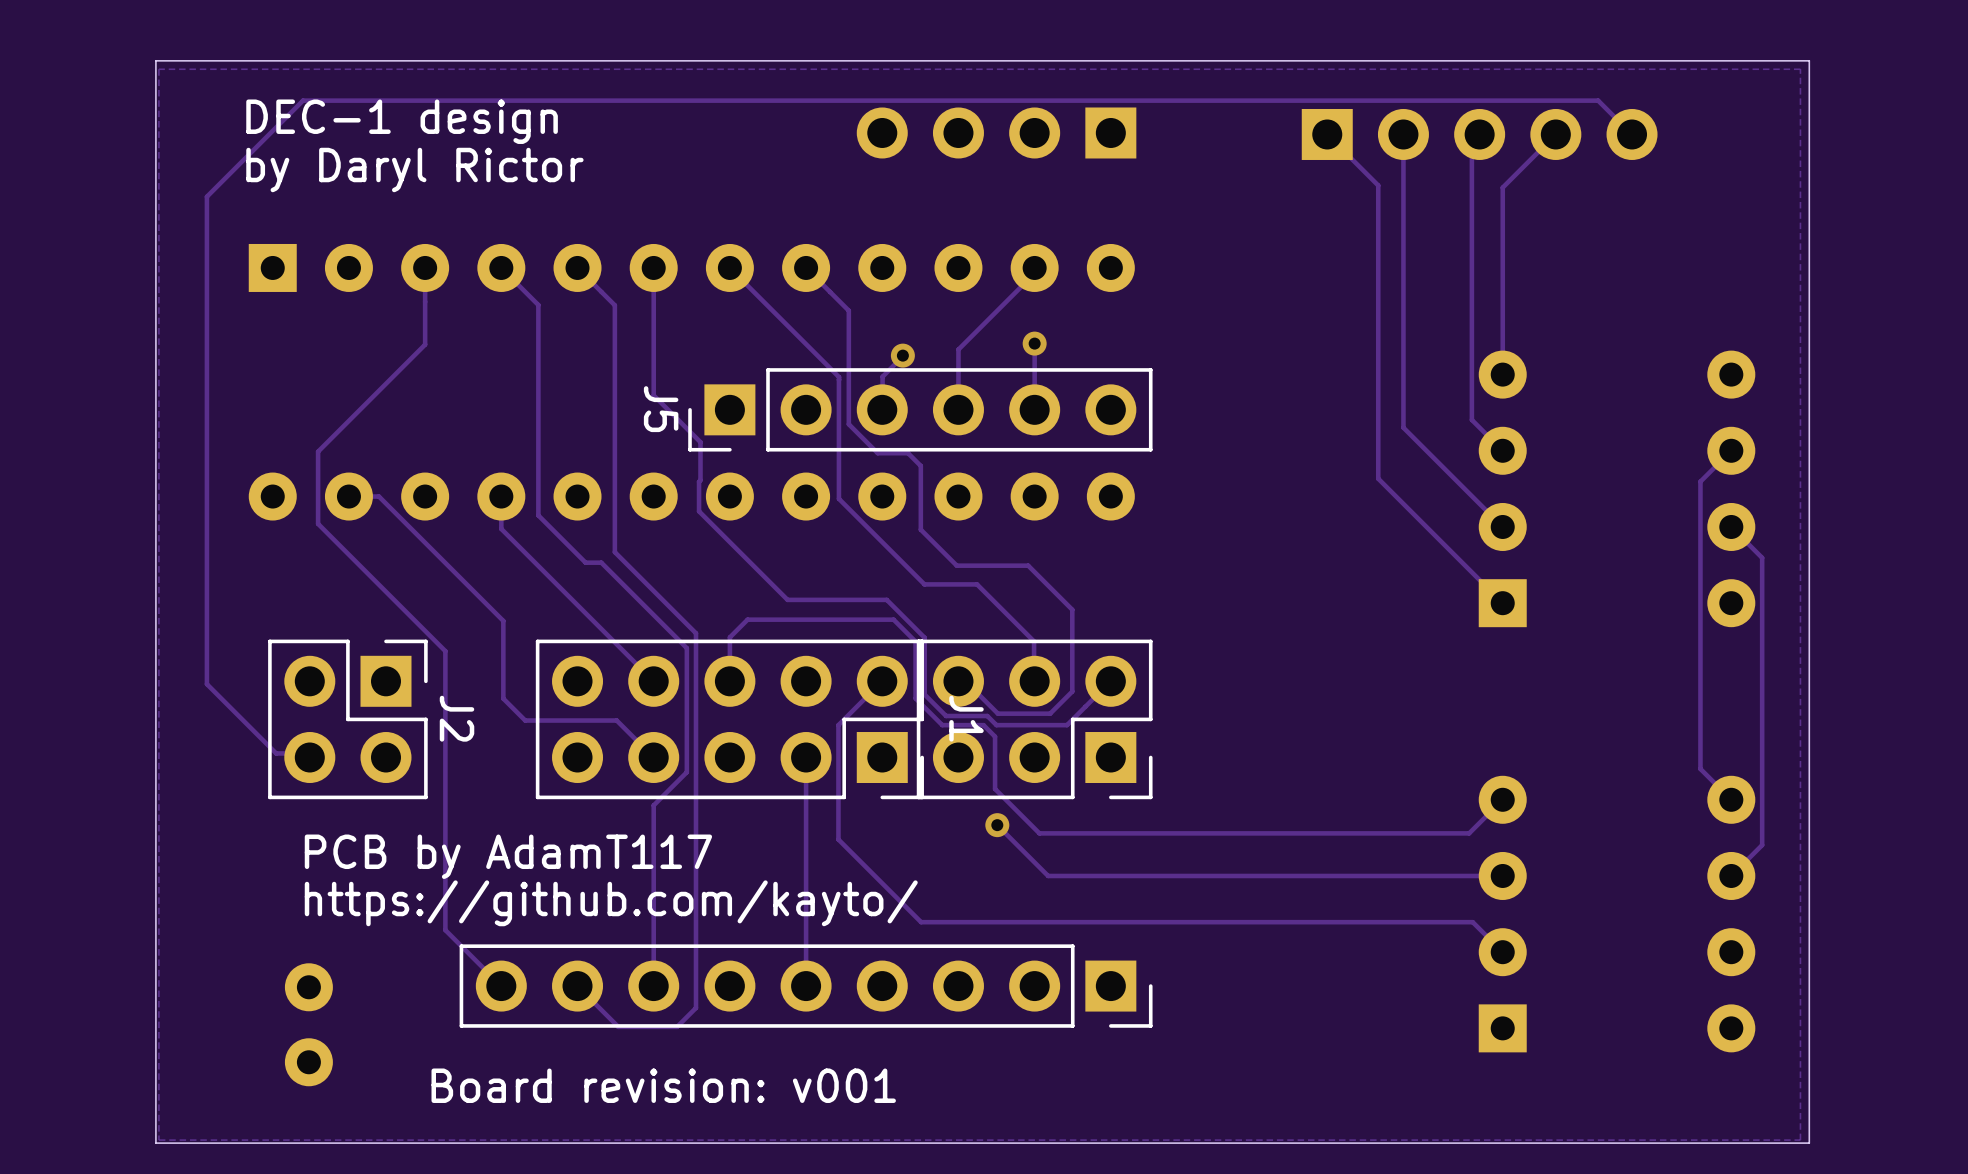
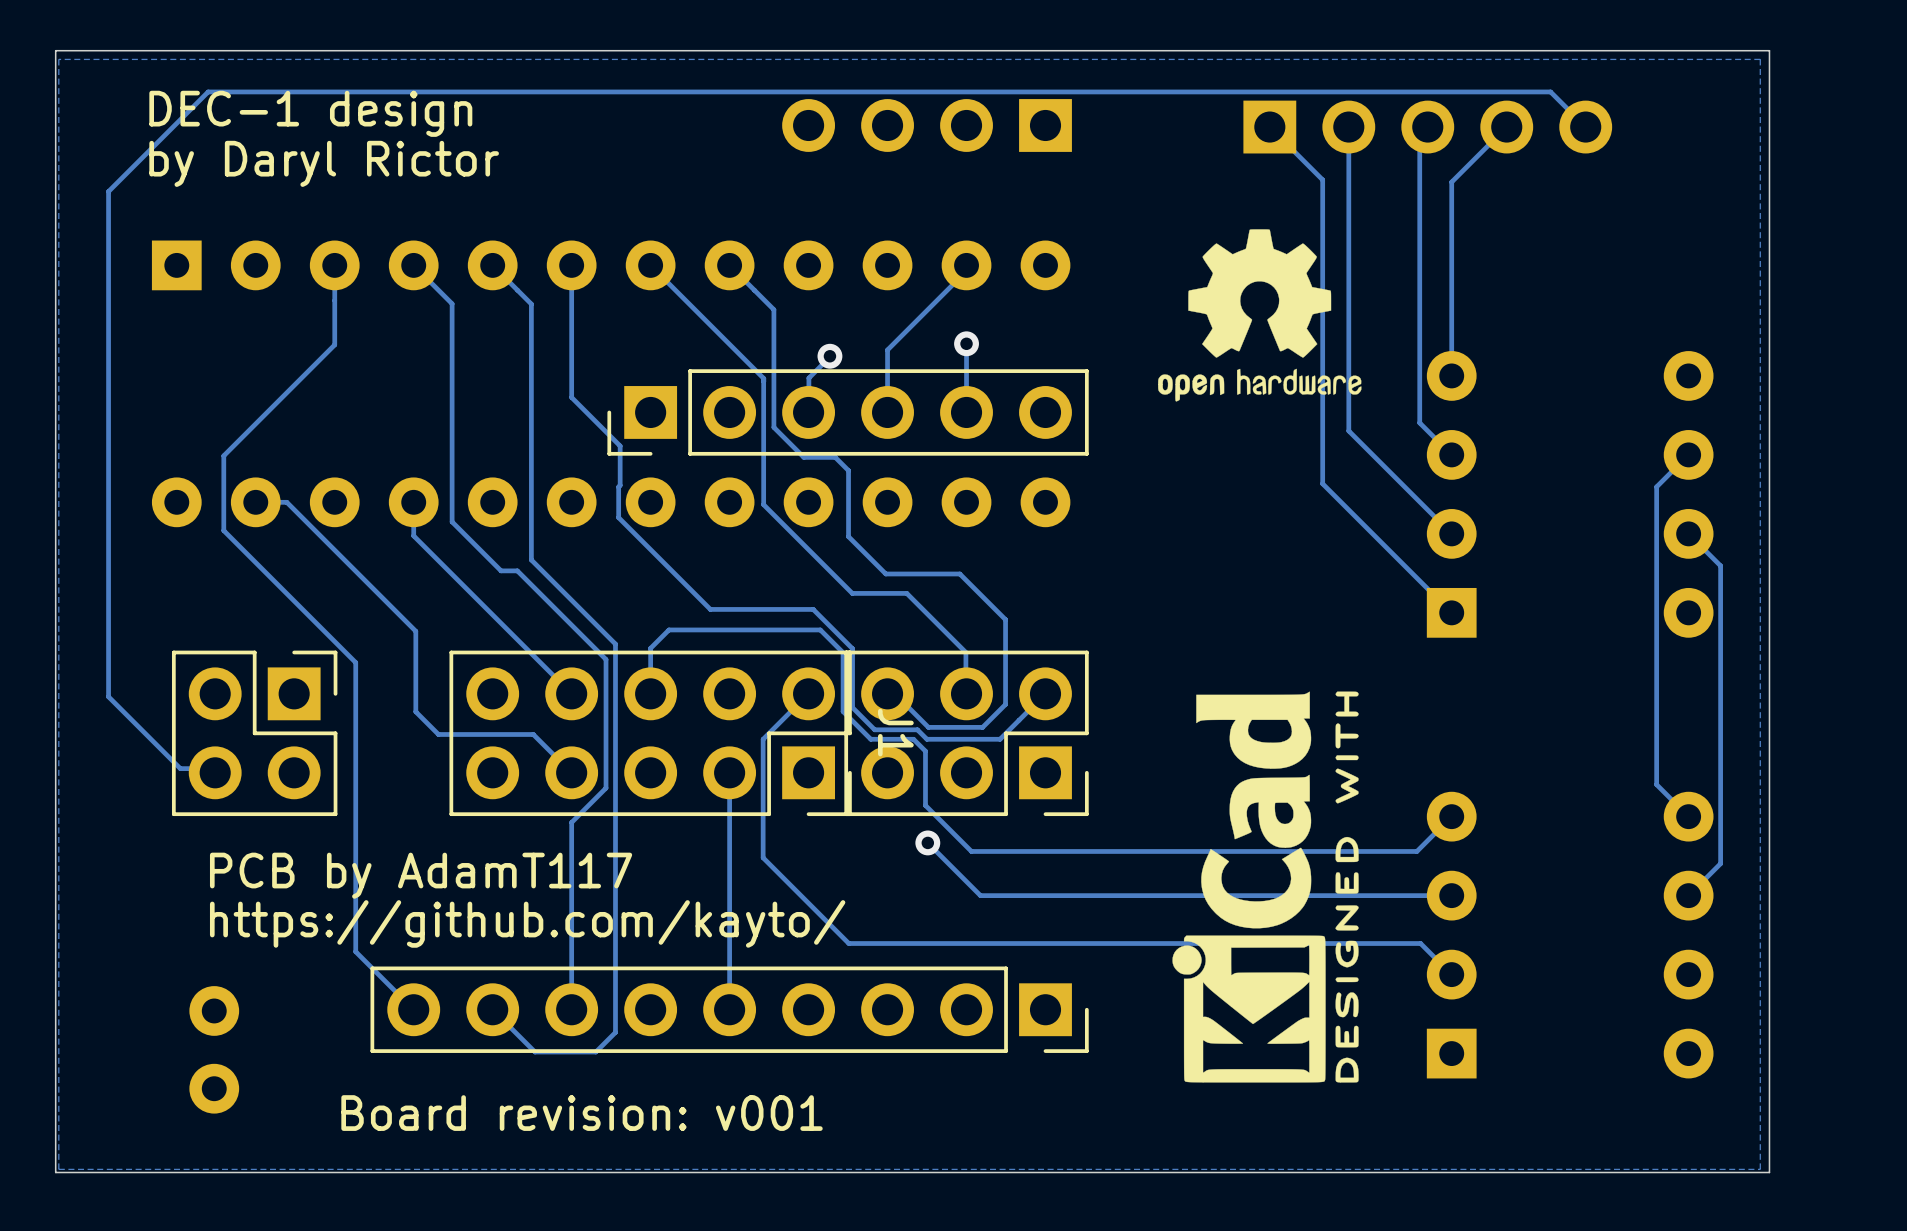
drawing: none -> [1158, 229, 1362, 402]
J5 name: J5 (661, 409) -> none
drawing: none -> [1172, 691, 1359, 1083]
J2 name: J2 (457, 718) -> none

